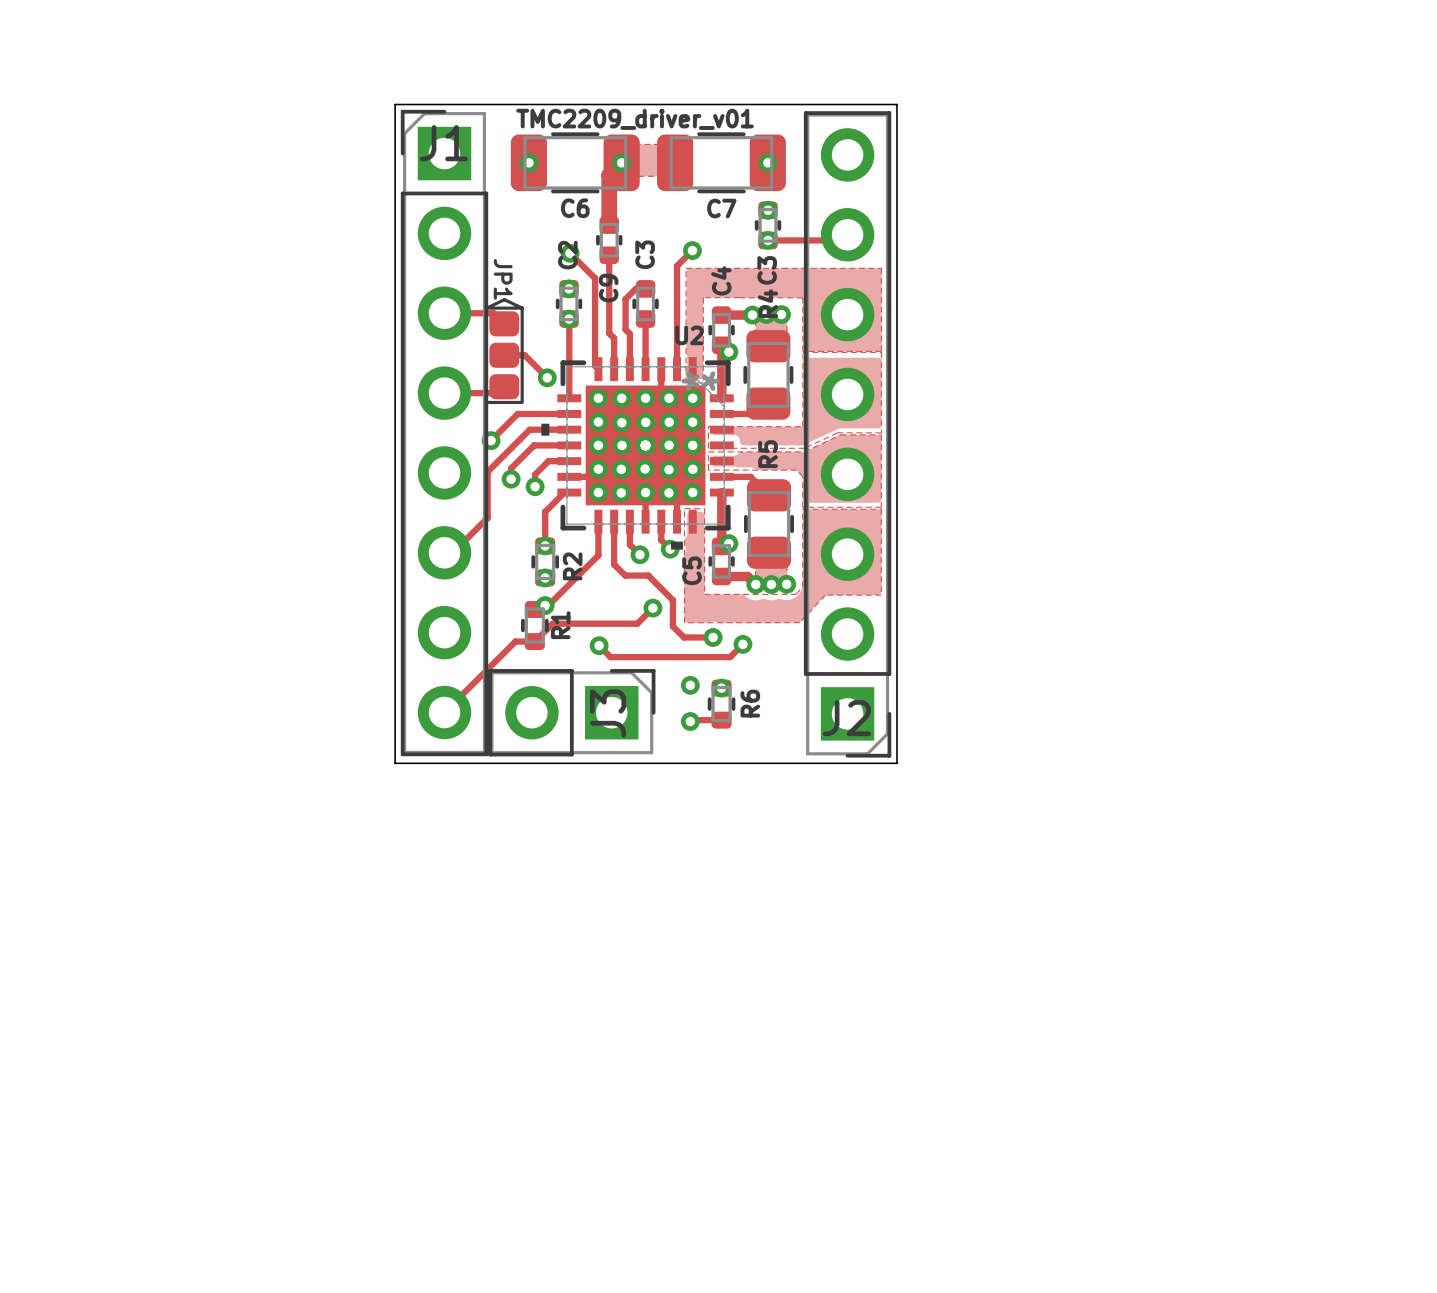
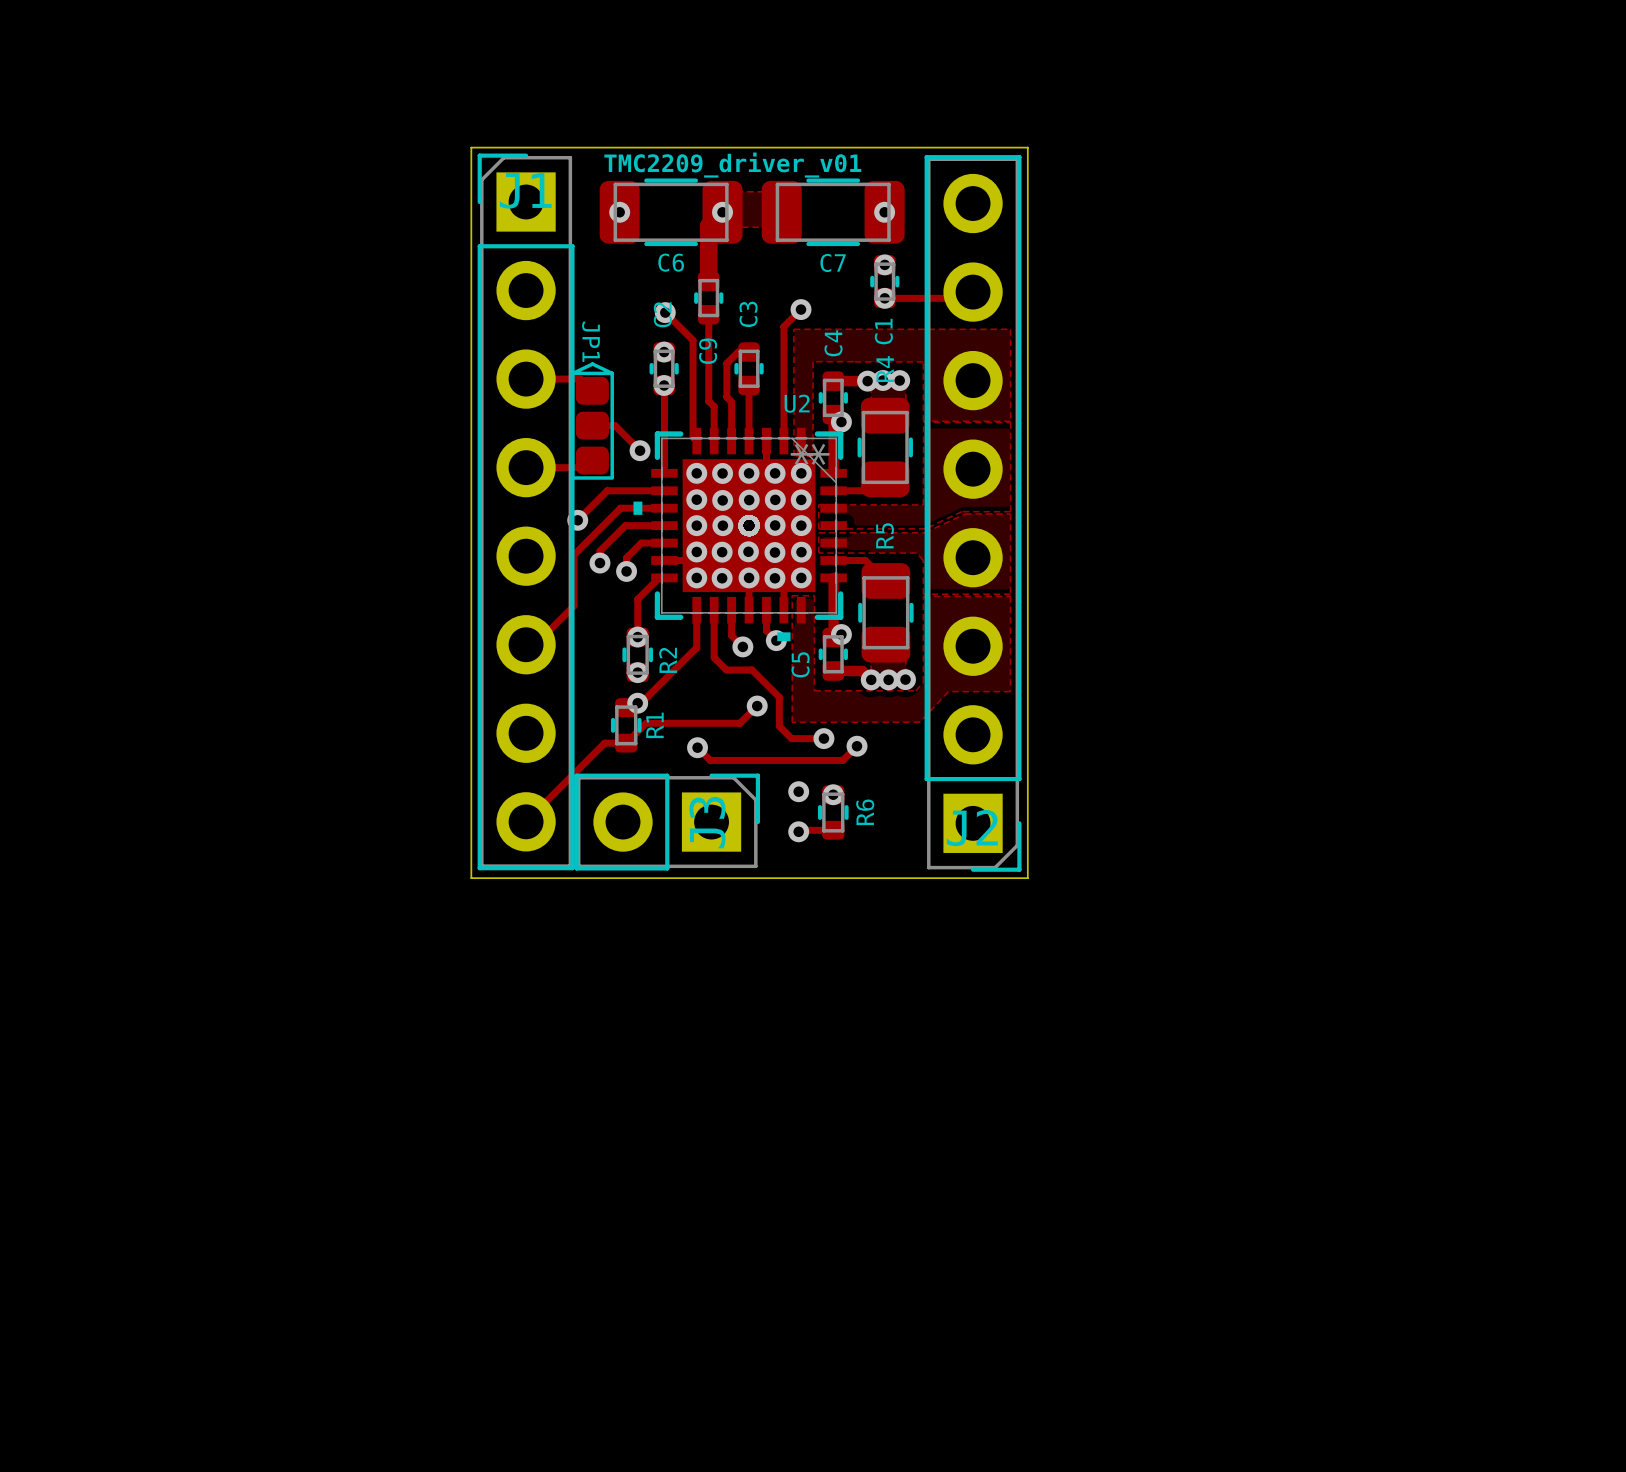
C3 name: C3 (767, 270) -> C1 (883, 331)

